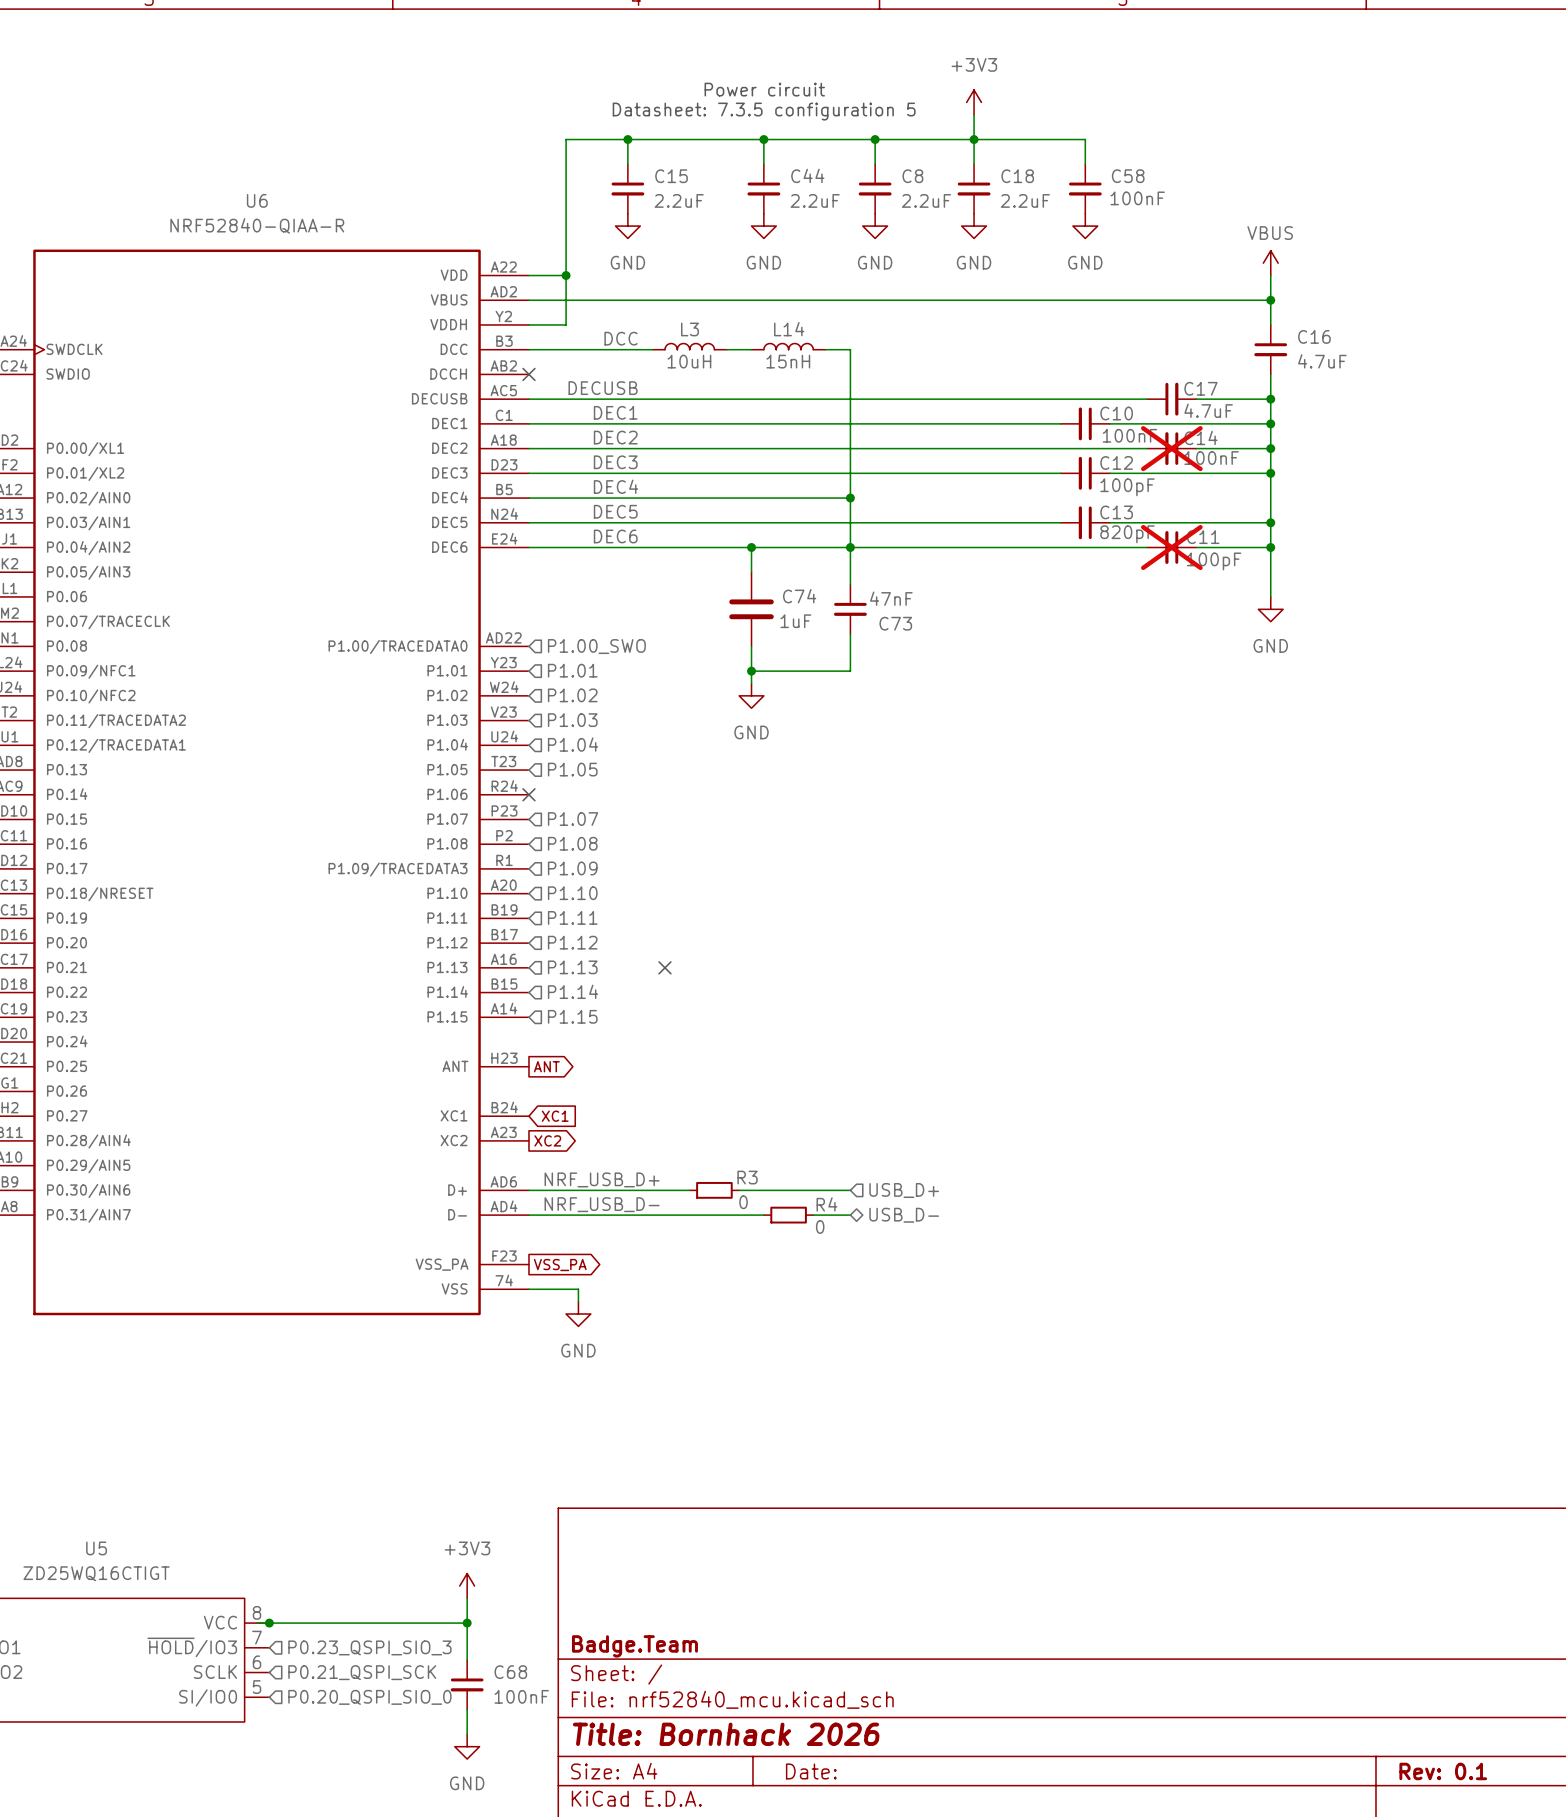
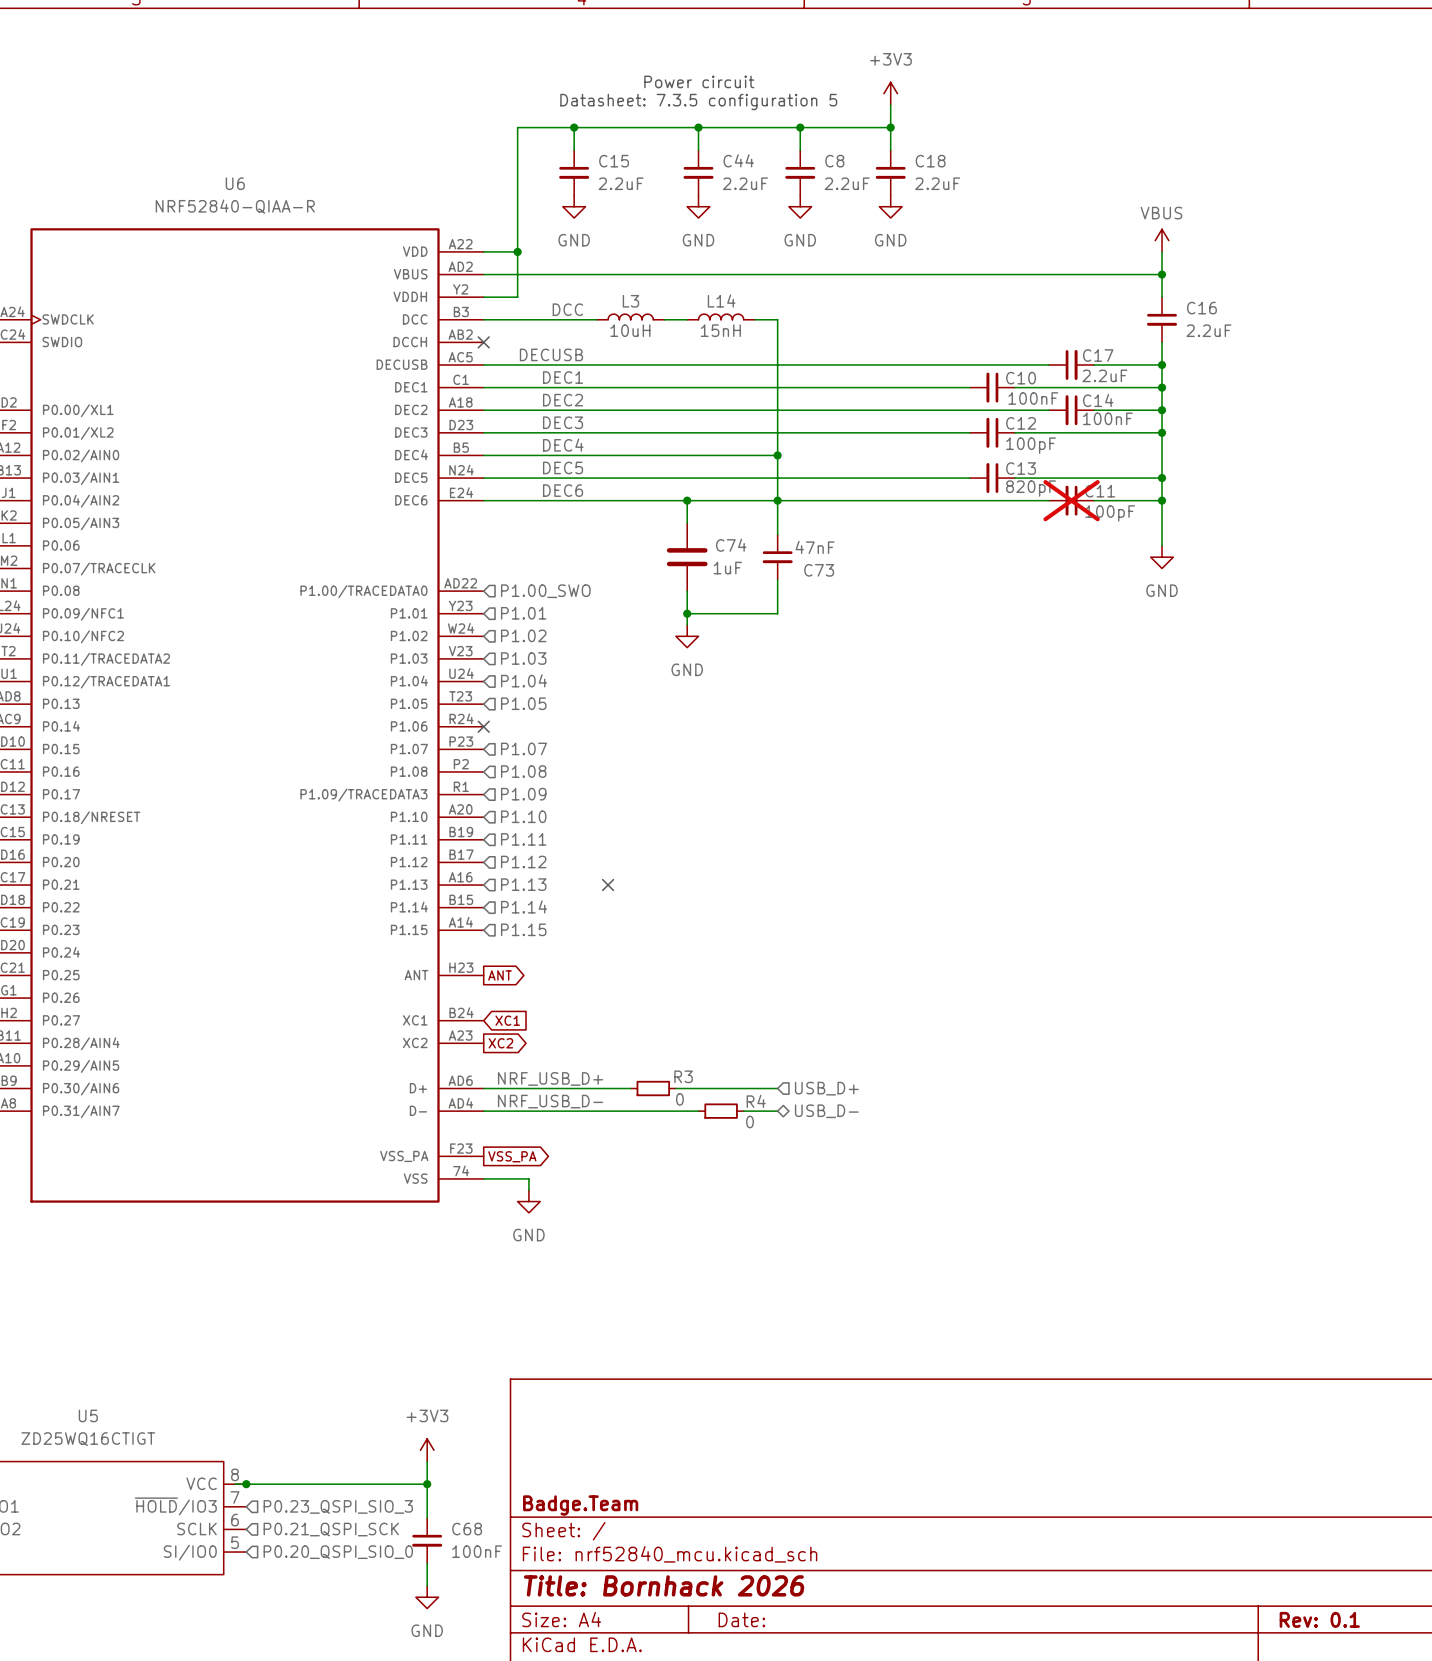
wire: (974, 139) (1085, 139) (1085, 164) -> none
C58: 100nF (1085, 188) -> none
power symbol: GND (1085, 226) -> none
C16 value: 4.7uF (1322, 361) -> 2.2uF (1208, 330)
C17 value: 4.7uF (1208, 410) -> 2.2uF (1104, 375)
C14 do-not-place cross: (1171, 448) -> none

